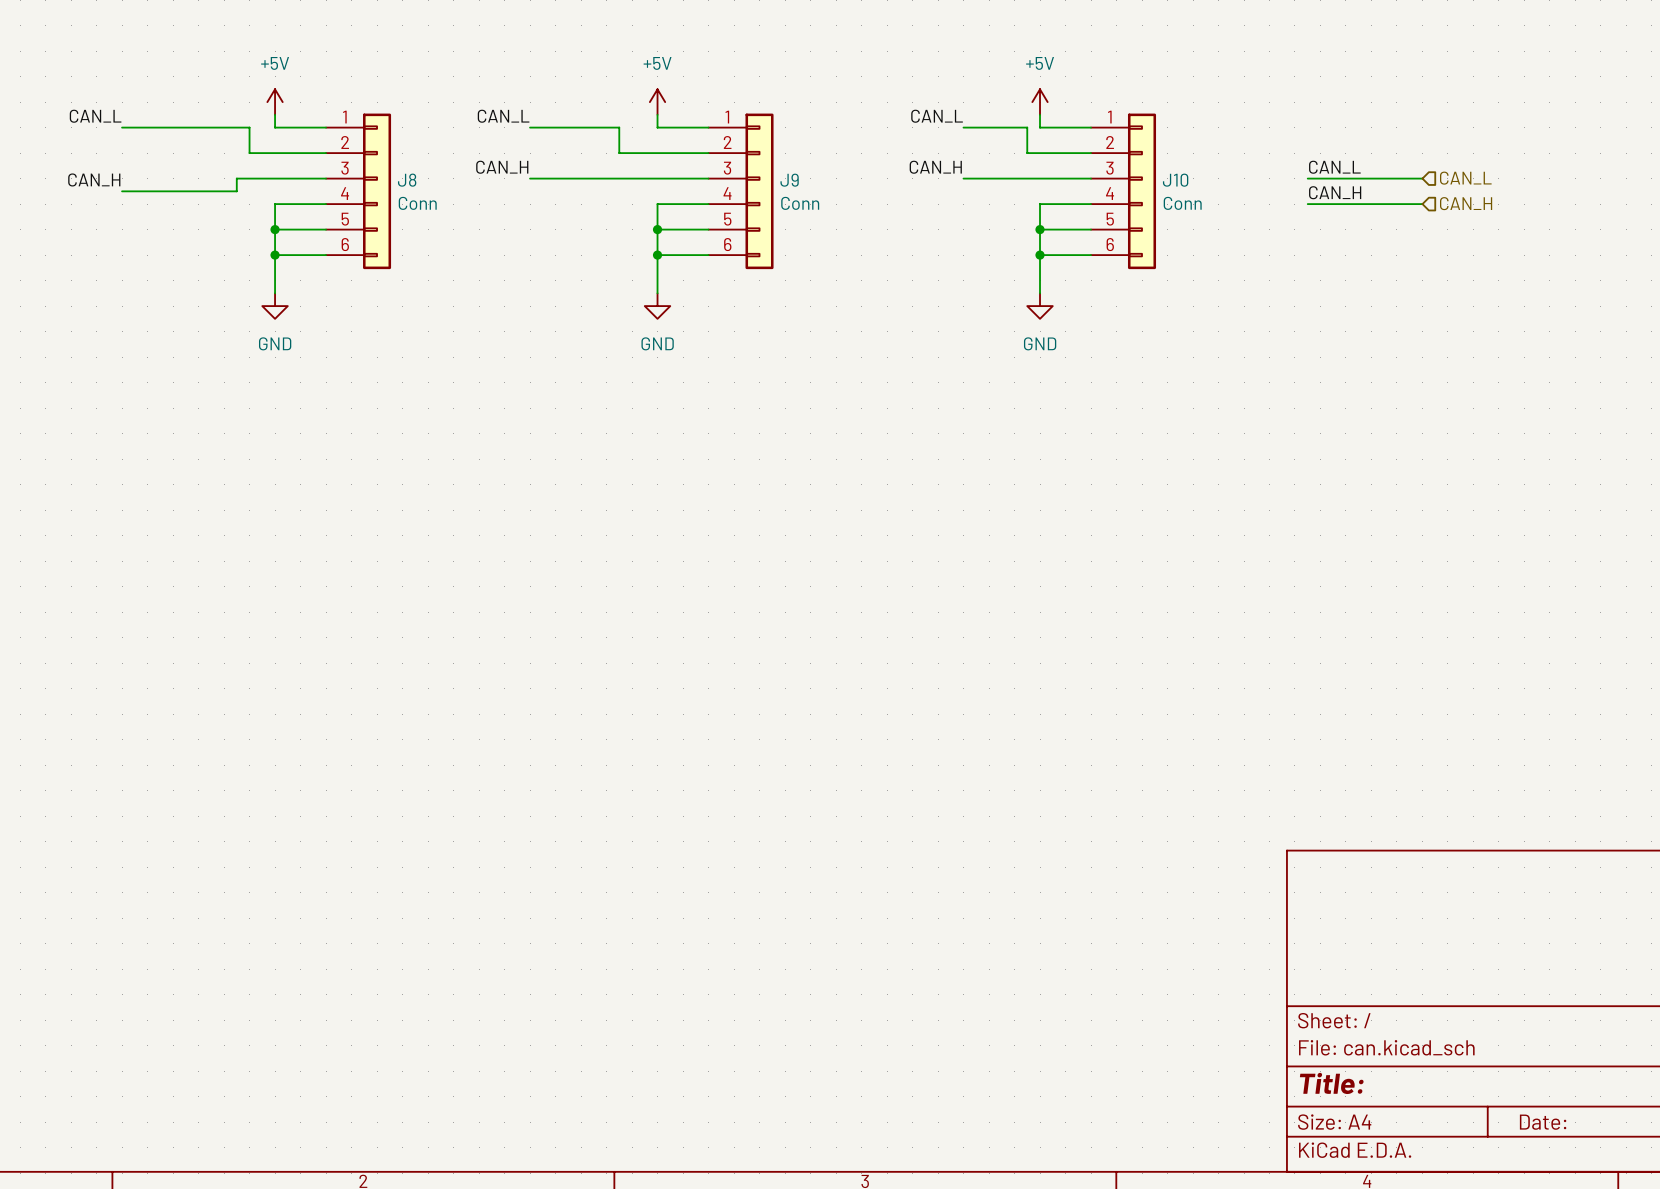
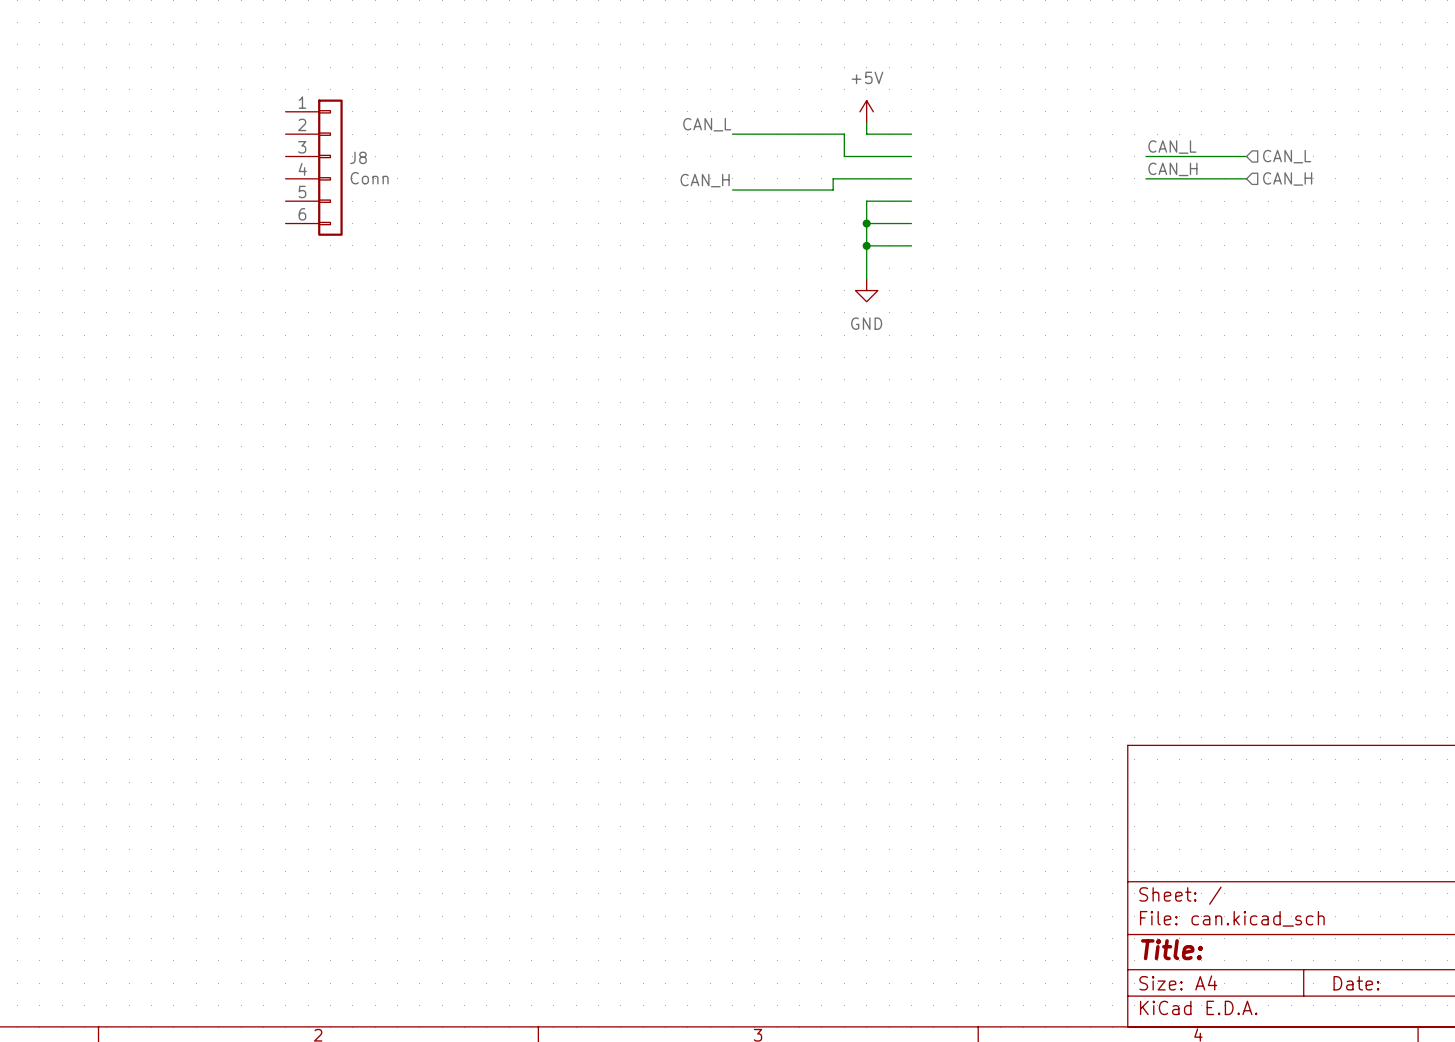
power symbol: +5V (275, 102) -> none
power symbol: +5V (657, 102) -> none
power symbol position: +5V (1040, 102) -> +5V (866, 111)
wire: (275, 114) (275, 127) (326, 127) -> none
wire: (657, 114) (657, 127) (708, 127) -> none
wire: (1040, 114) (1040, 127) (1091, 127) -> none
label: CAN_L (95, 116) -> none
label: CAN_L (503, 116) -> none
label position: CAN_L (937, 116) -> CAN_L (707, 124)
wire: (122, 127) (249, 127) (249, 153) (326, 153) -> none
wire: (530, 127) (619, 127) (619, 153) (708, 153) -> none
wire: (963, 127) (1027, 127) (1027, 153) -> (866, 122) (866, 134) (900, 134)
wire: none -> (732, 134) (844, 134) (844, 156)
wire: (1040, 153) (1091, 153) -> none
label: CAN_H (502, 167) -> none
label position: CAN_H (935, 167) -> CAN_H (705, 180)
wire: (326, 178) (236, 178) (236, 191) (122, 191) -> none
wire: (530, 178) (708, 178) -> none
wire: (1040, 178) (1091, 178) -> (866, 245) (911, 245)
label: CAN_H (94, 179) -> none
J9: Conn (741, 191) -> none
J10: Conn (1123, 191) -> none
wire: (326, 204) (275, 204) (275, 293) -> none
wire: (708, 204) (657, 204) (657, 293) -> none
wire: none -> (911, 178) (833, 178) (833, 190) (732, 190)
wire: (1091, 204) (1040, 204) (1040, 293) -> none
wire: (275, 229) (326, 229) -> none
junction: (275, 229) -> none
wire: (657, 229) (708, 229) -> none
junction: (657, 229) -> none
wire: (1040, 229) (1091, 229) -> (911, 201) (866, 201) (866, 279)
junction: (1040, 229) -> none
wire: (275, 255) (326, 255) -> none
junction: (275, 255) -> none
wire: (657, 255) (708, 255) -> none
junction: (657, 255) -> none
junction: none -> (866, 223)
wire: (1040, 255) (1091, 255) -> (911, 223) (866, 223)
junction: (1040, 255) -> none
junction: none -> (866, 245)
power symbol: GND (275, 306) -> none
power symbol: GND (657, 306) -> none
power symbol position: GND (1040, 306) -> GND (866, 290)

